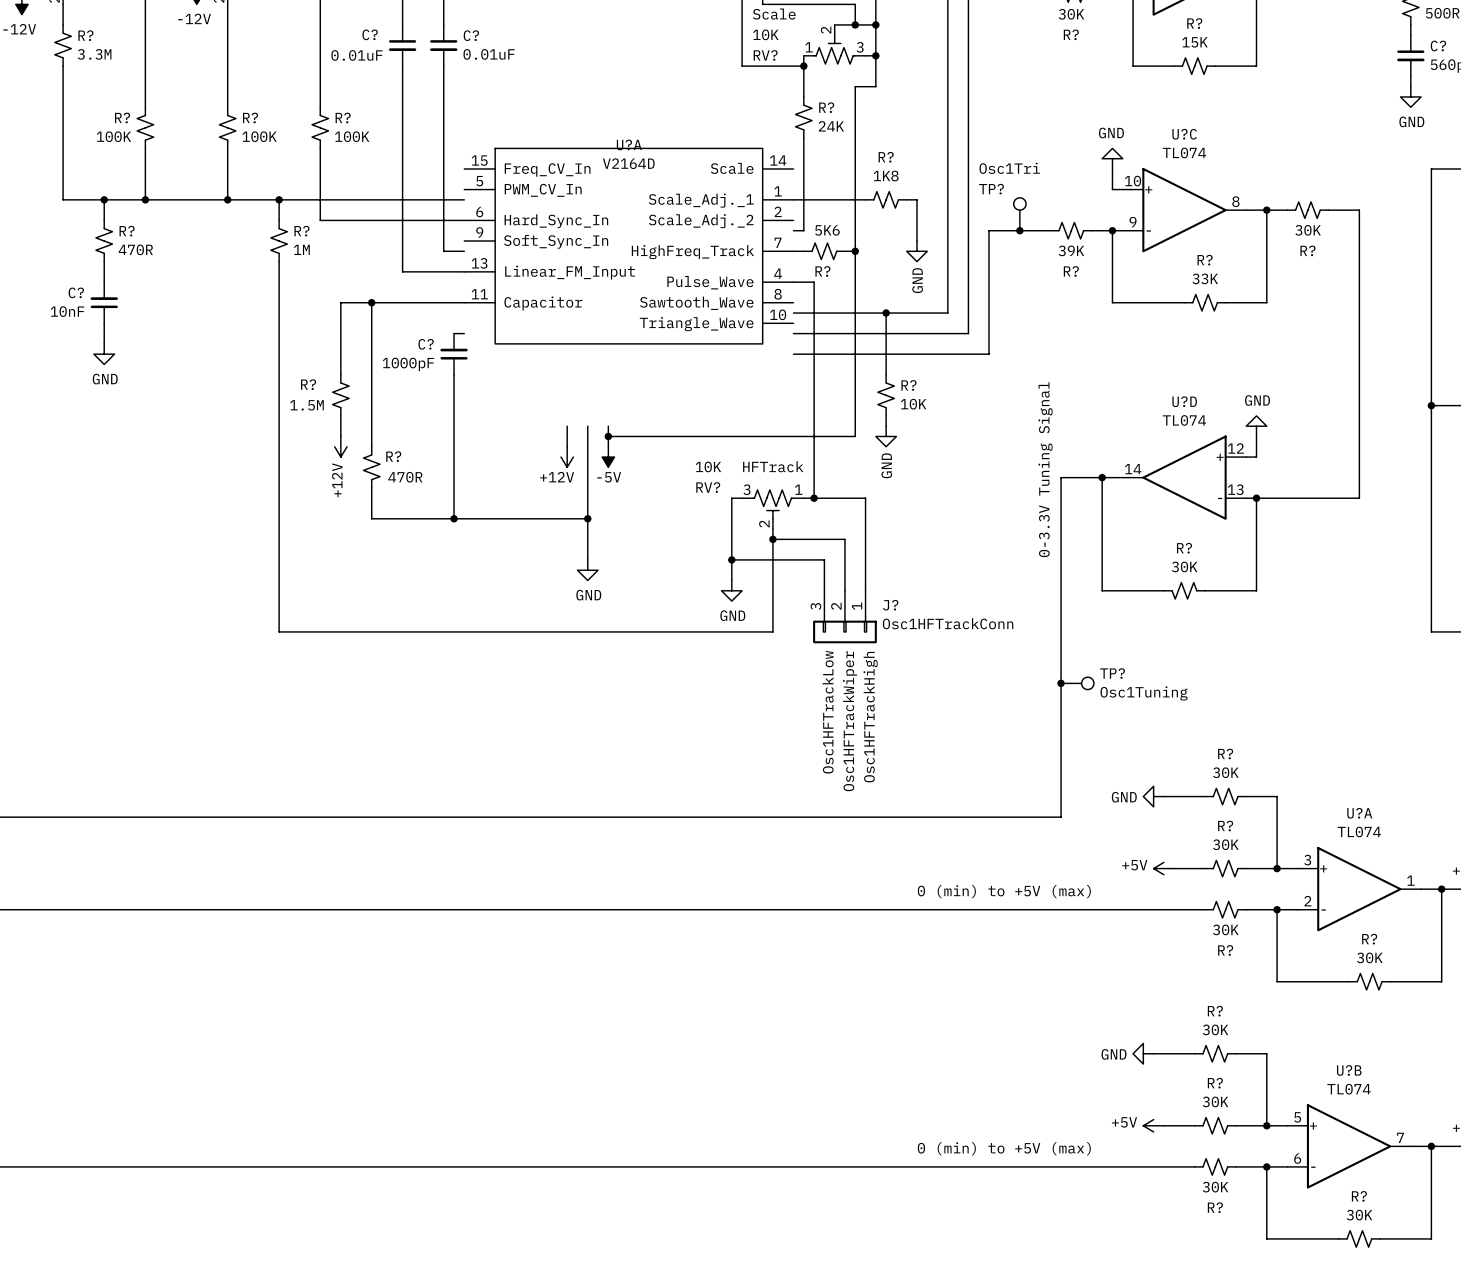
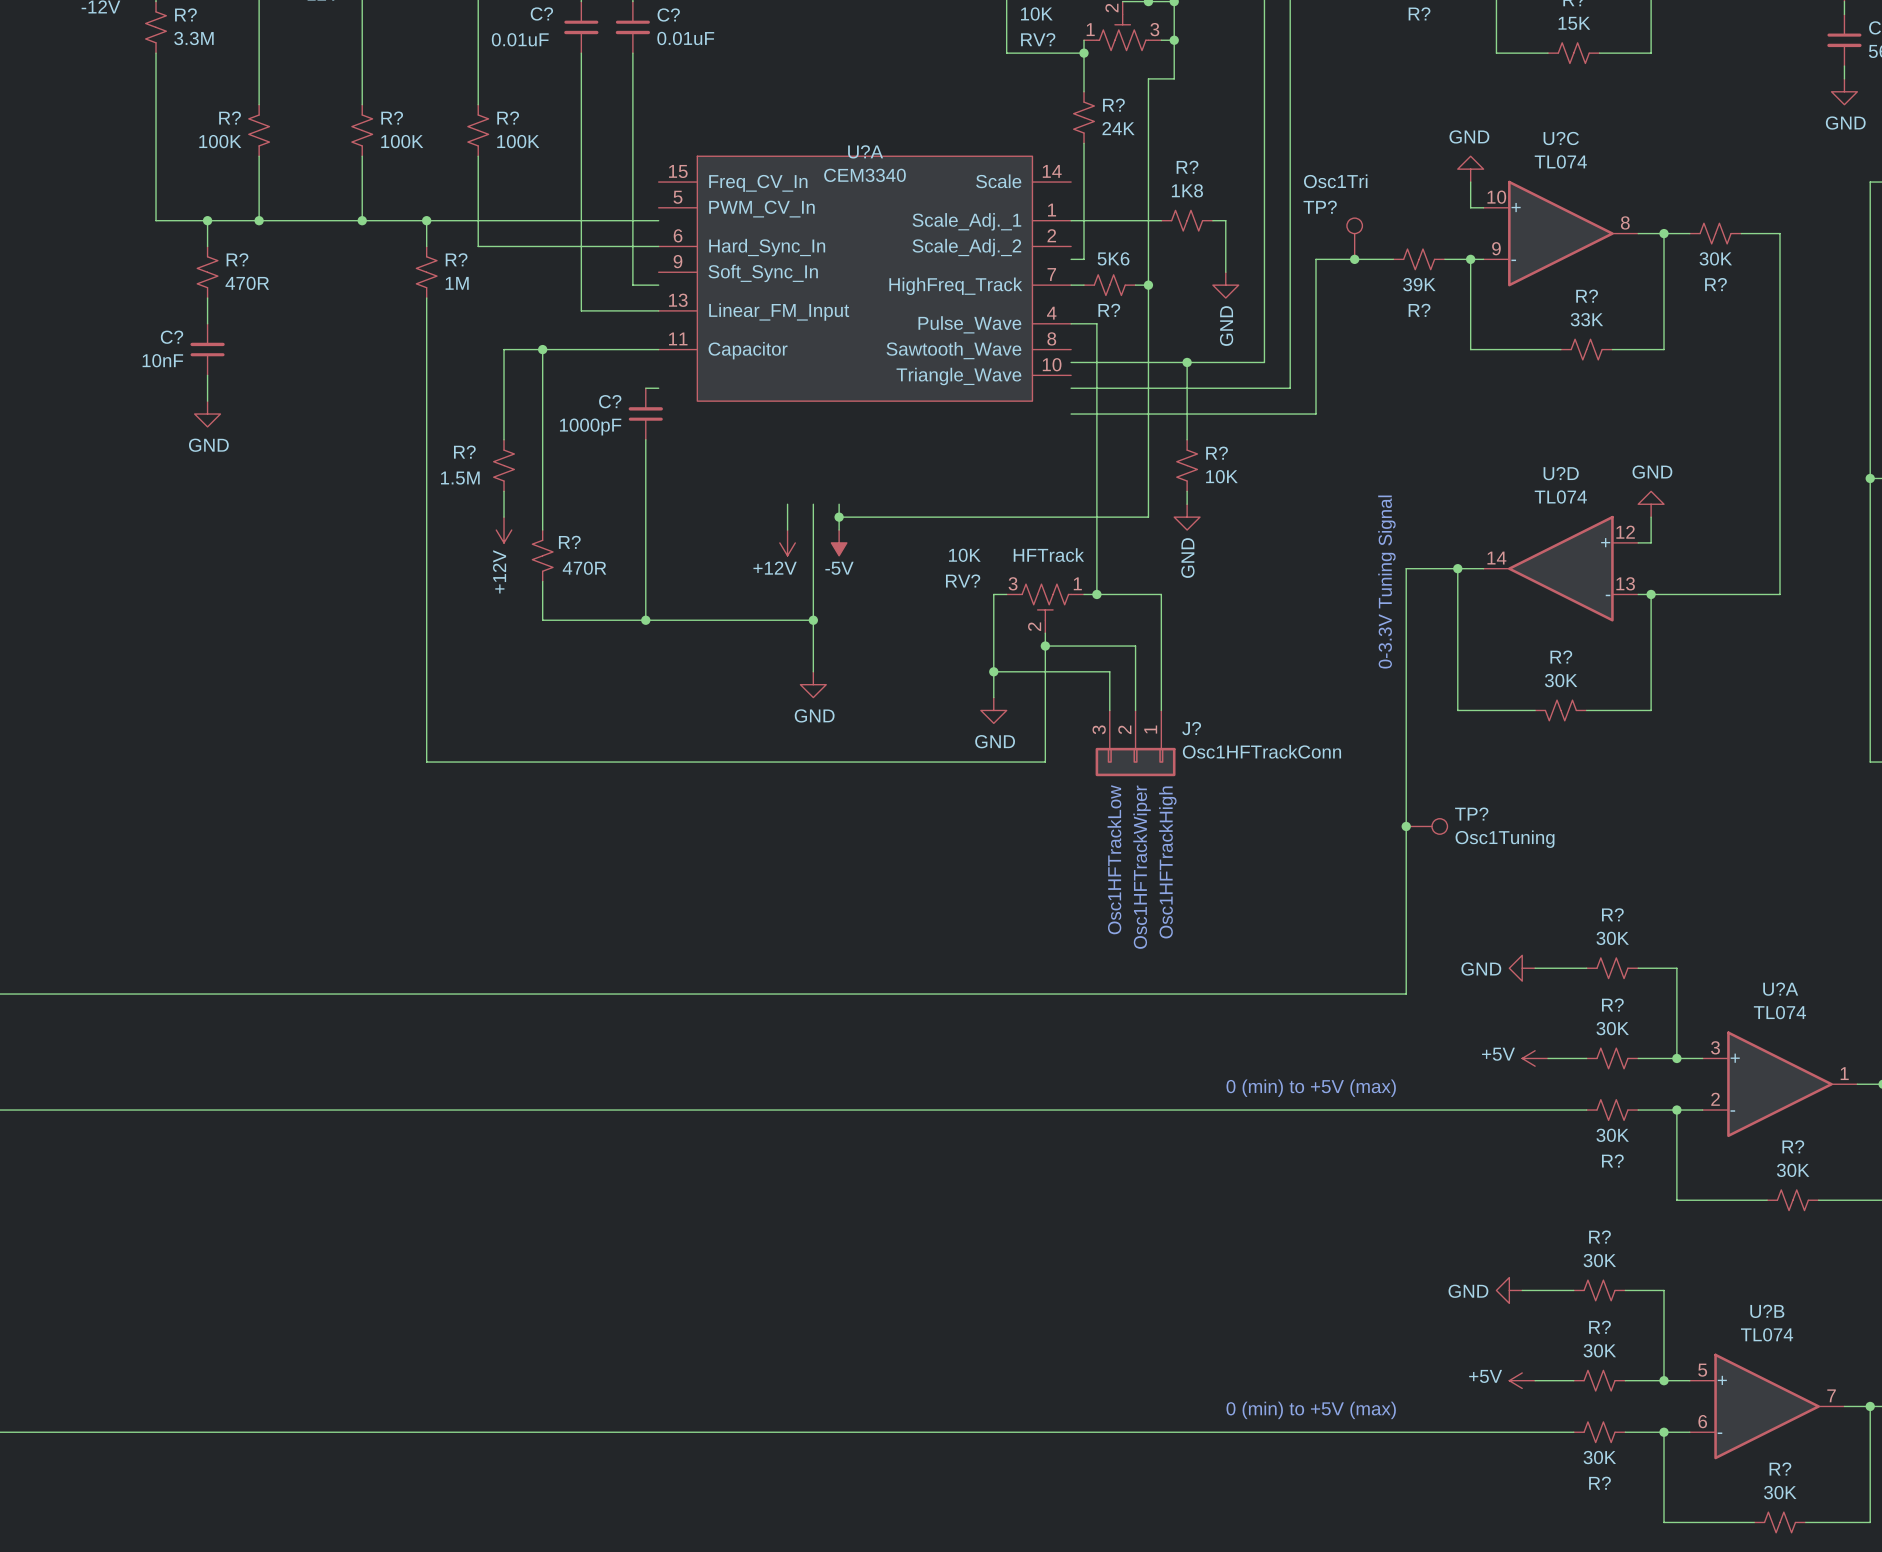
U?A value: V2164D (628, 163) -> CEM3340 (865, 175)

